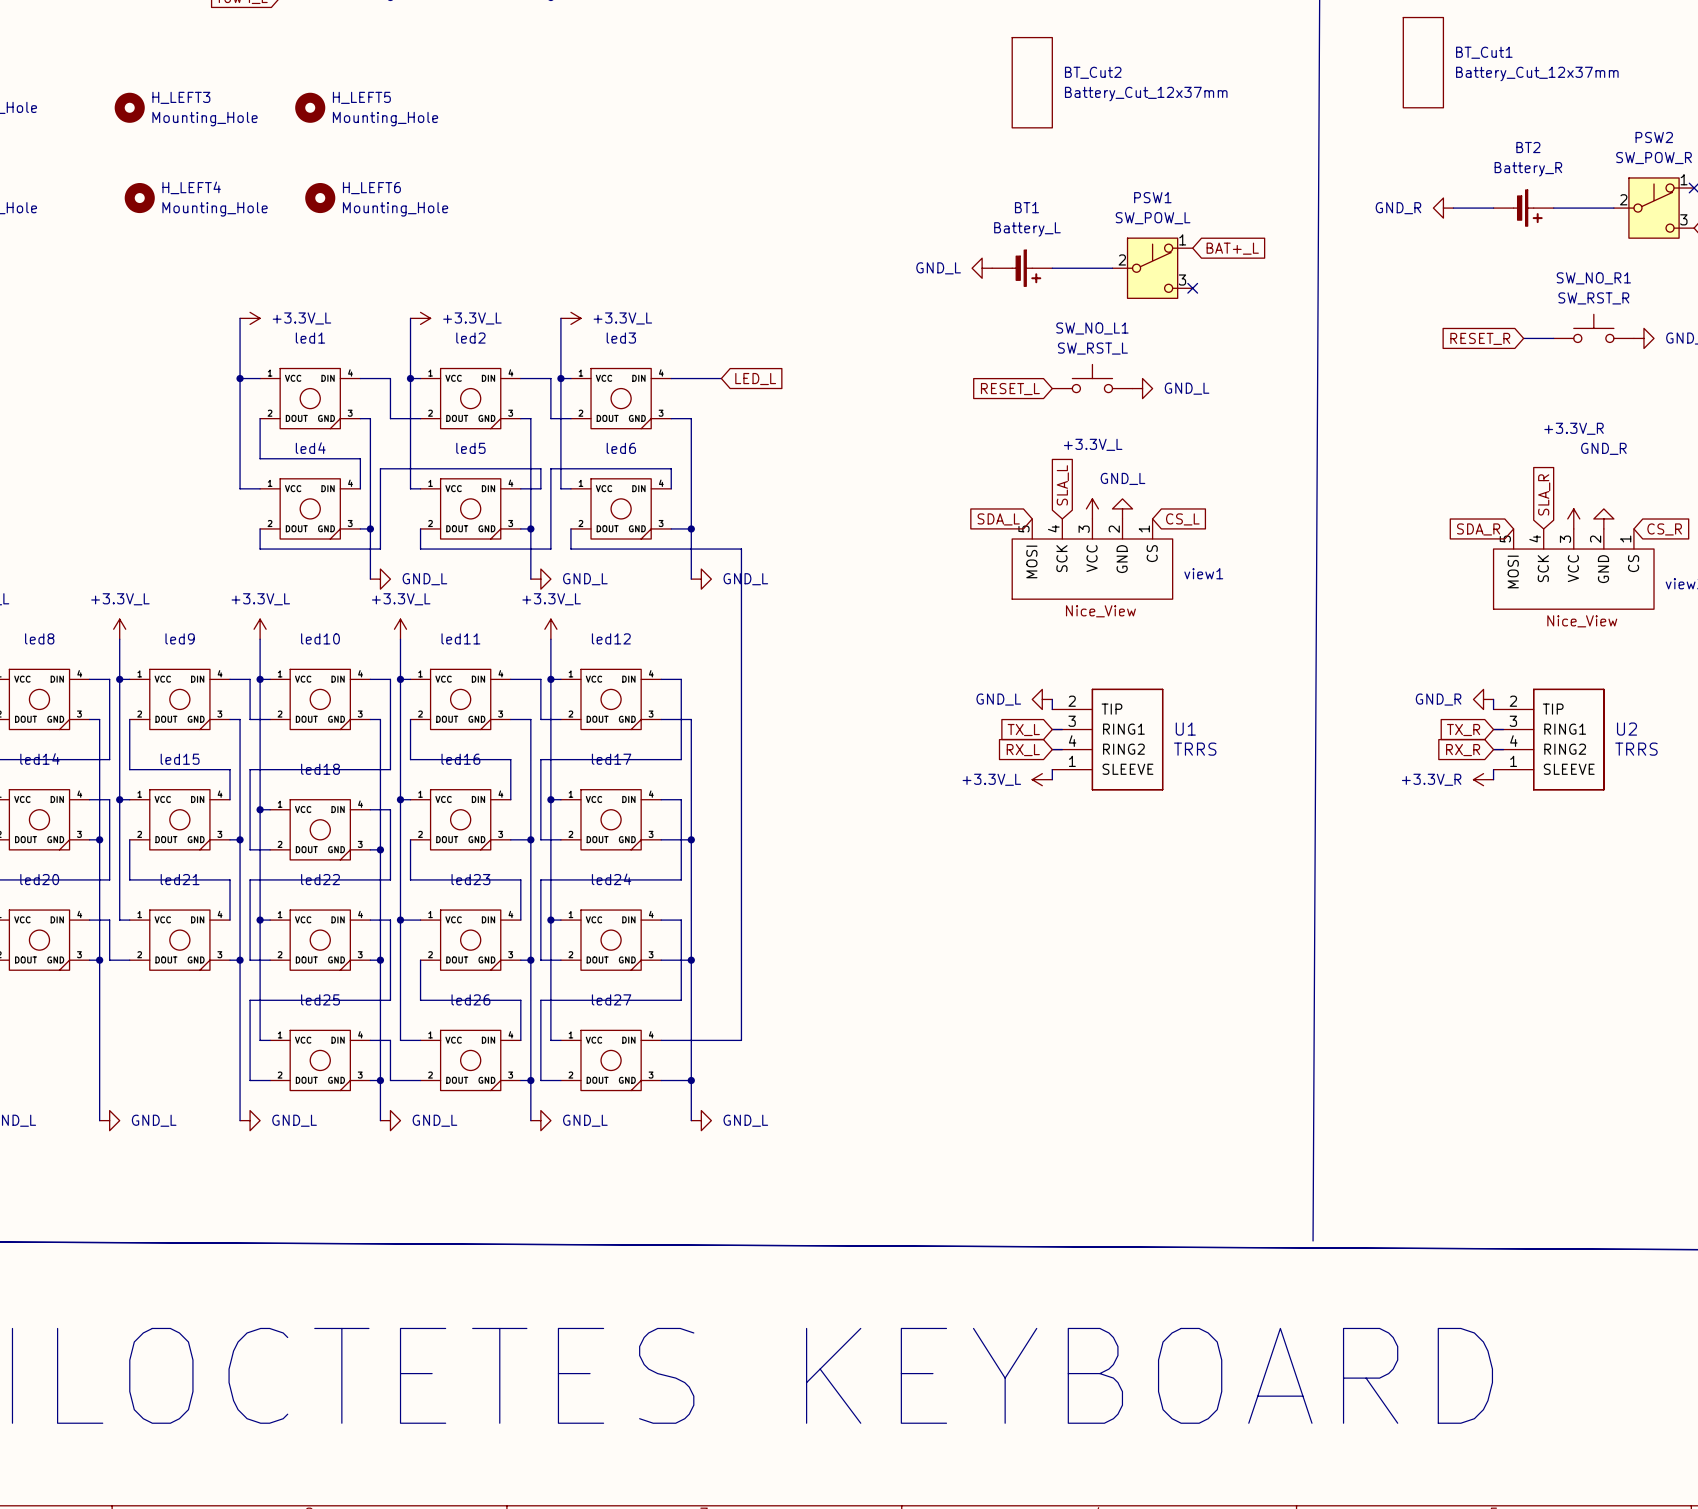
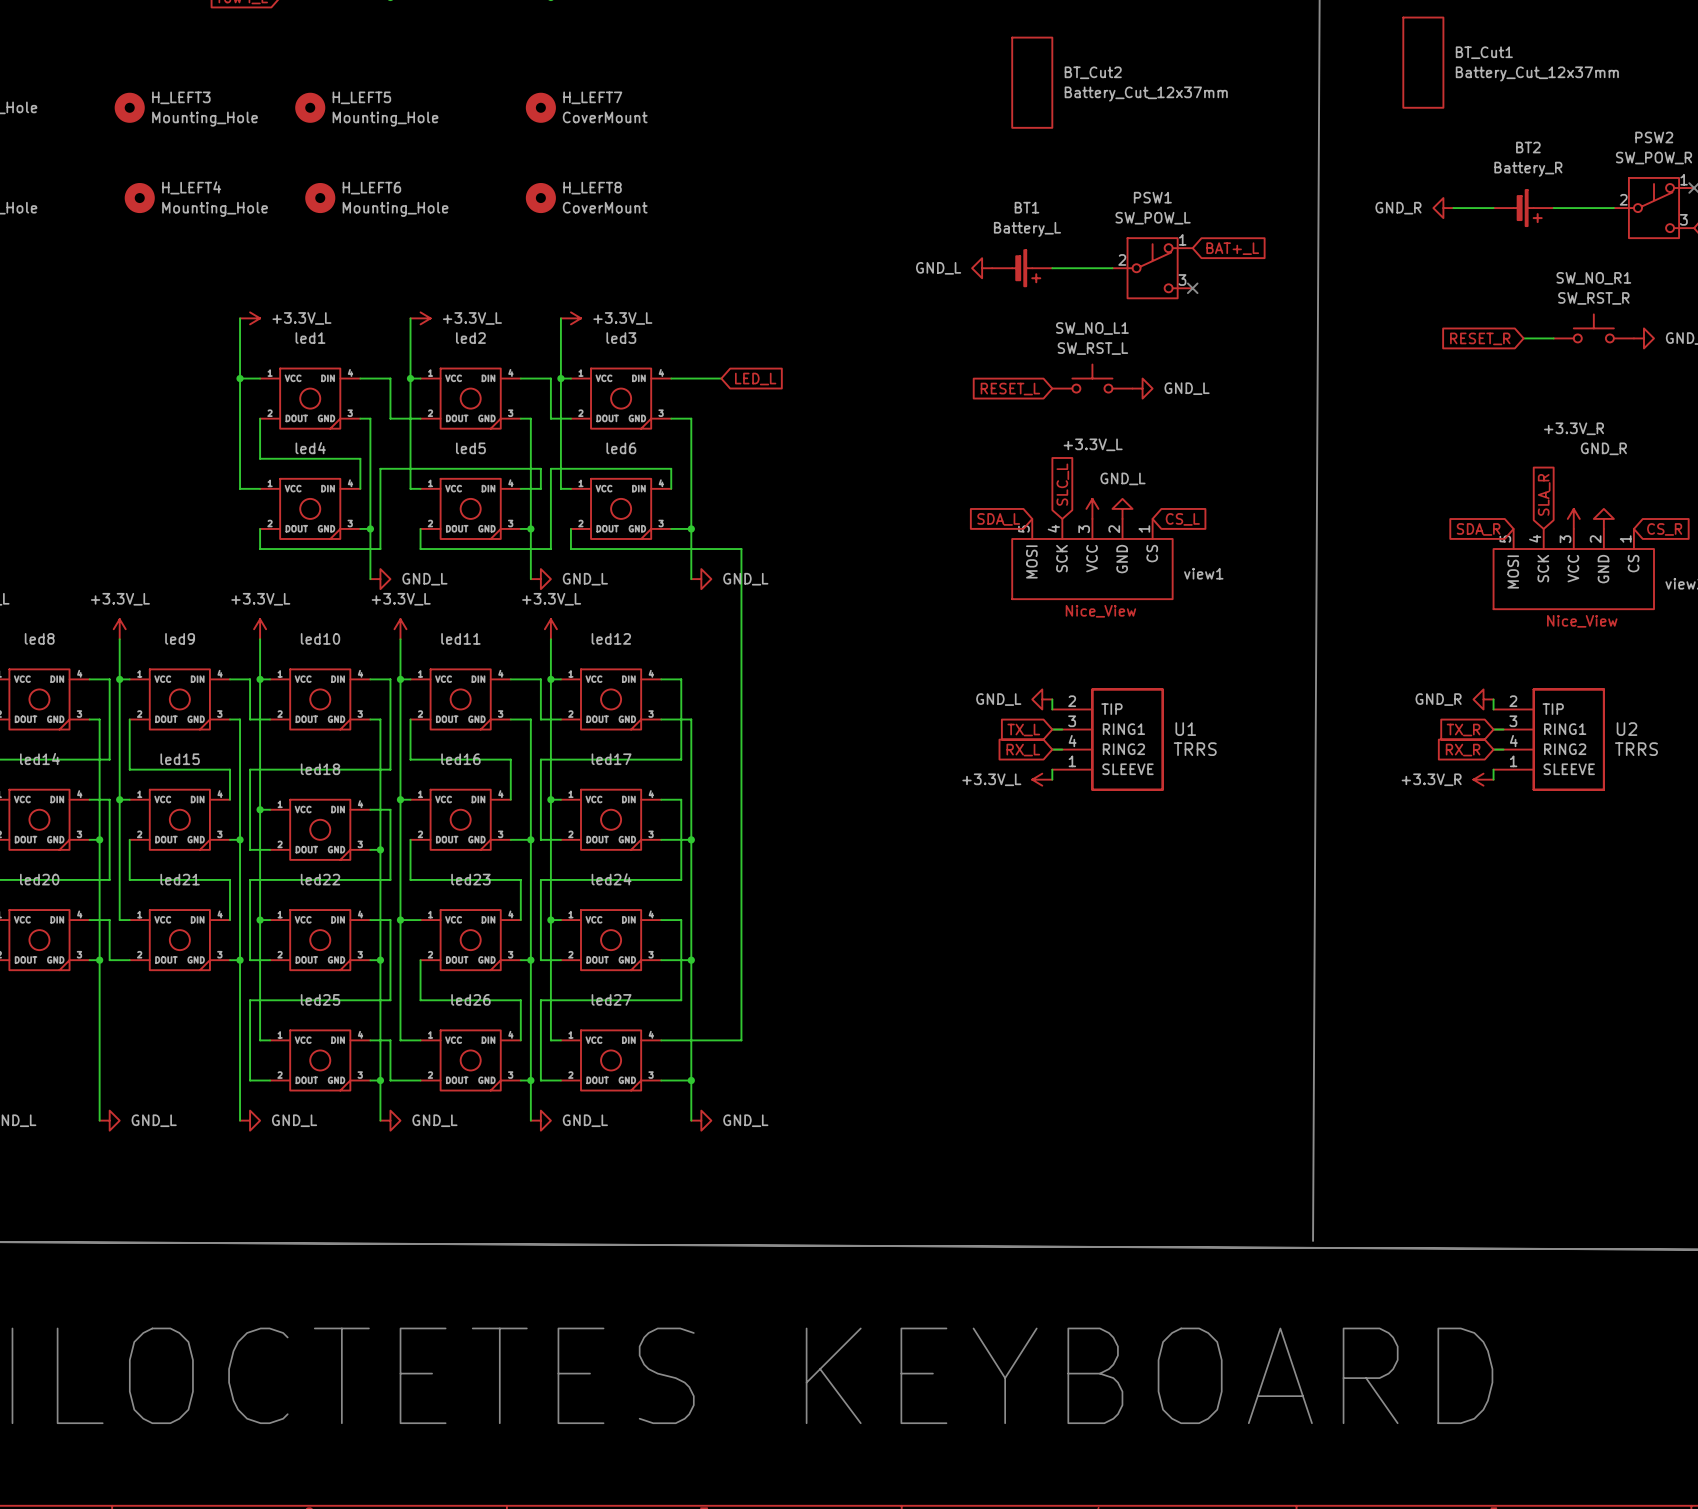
H_LEFT7: none -> CoverMount (540, 107)
H_LEFT8: none -> CoverMount (540, 198)
global label: SLA_L (1062, 485) -> SLC_L (1062, 484)

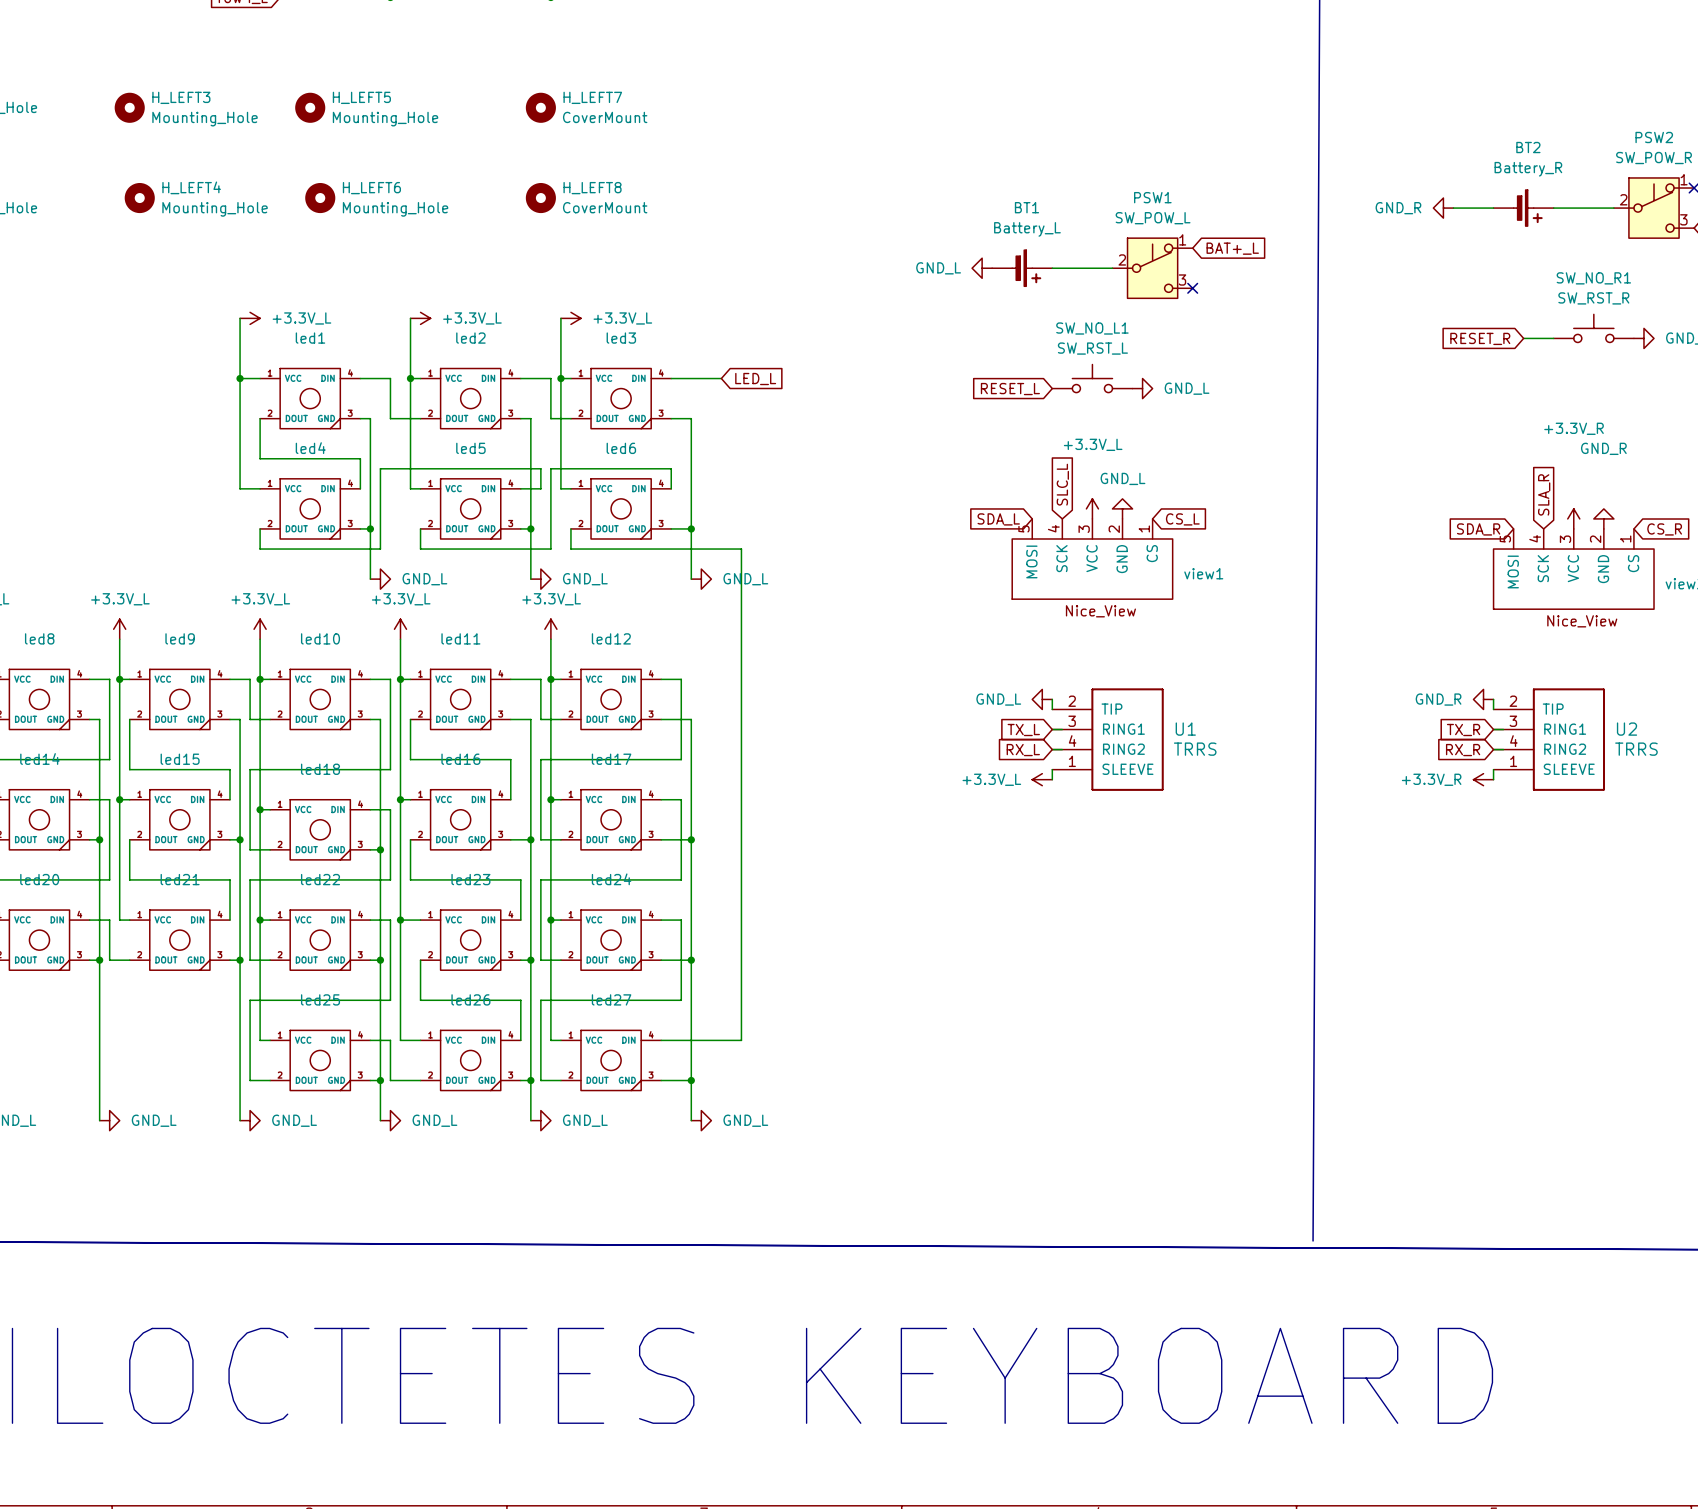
BT_Cut1: Battery_Cut_12x37mm (1423, 62) -> none
BT_Cut2: Battery_Cut_12x37mm (1032, 82) -> none

